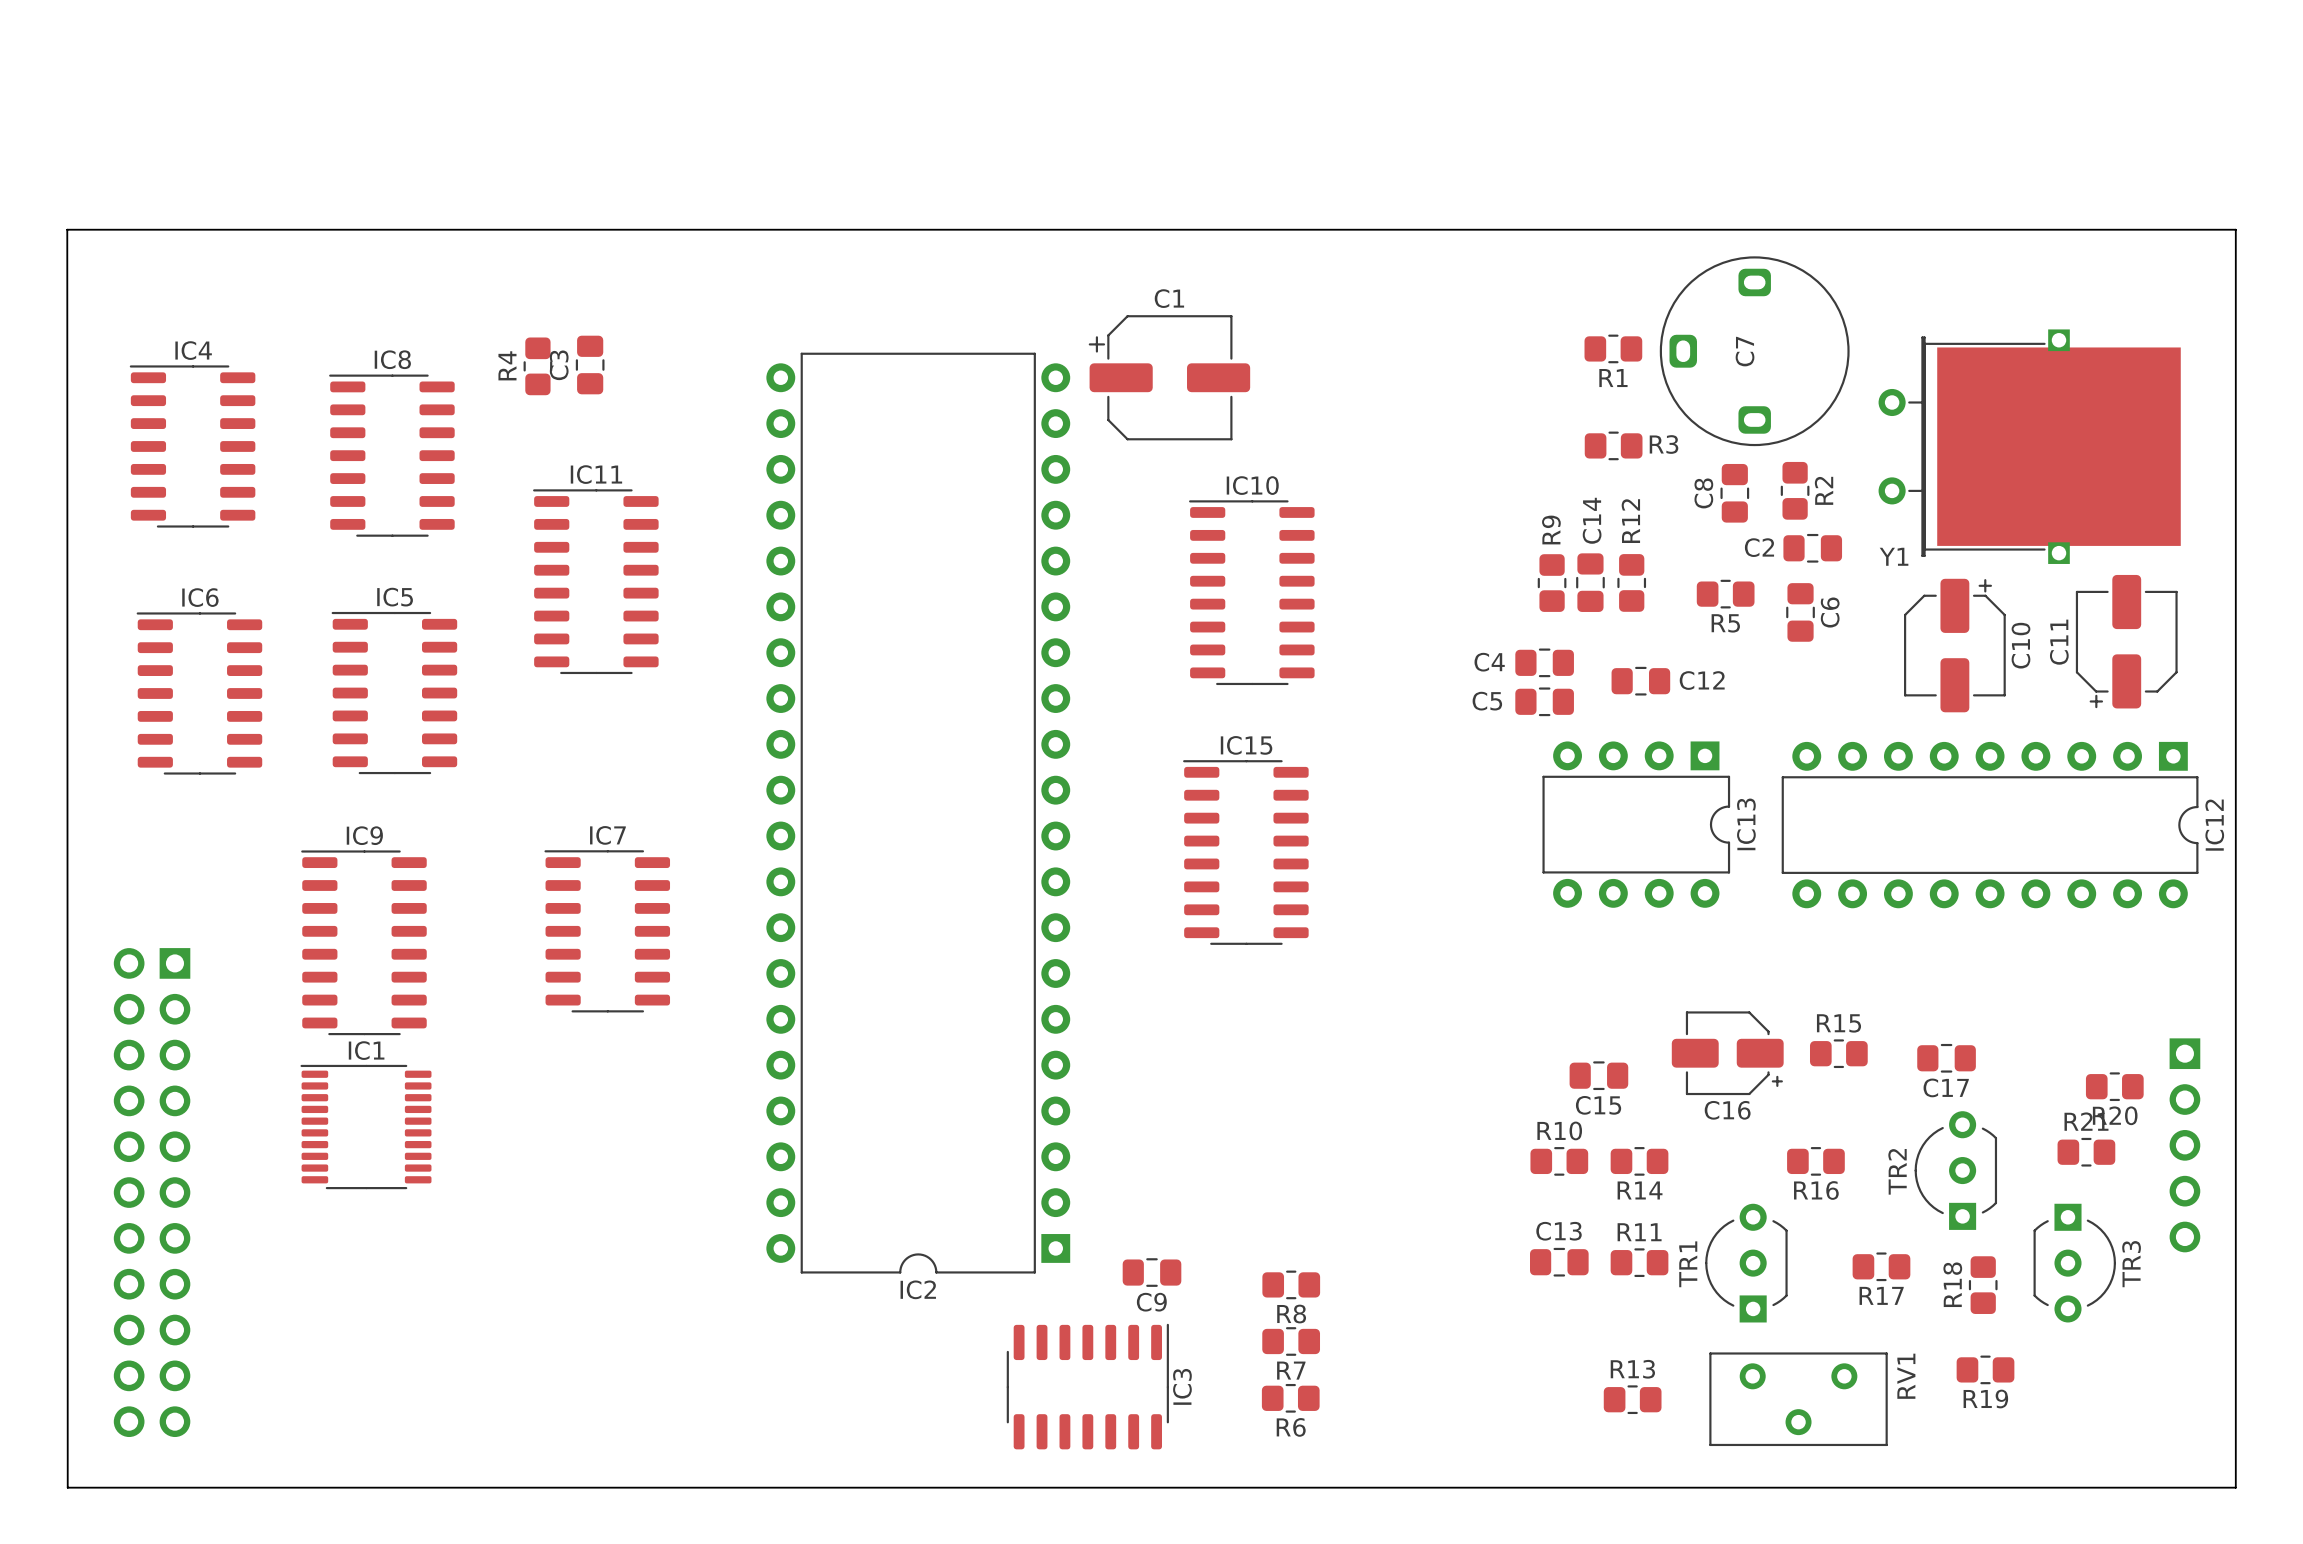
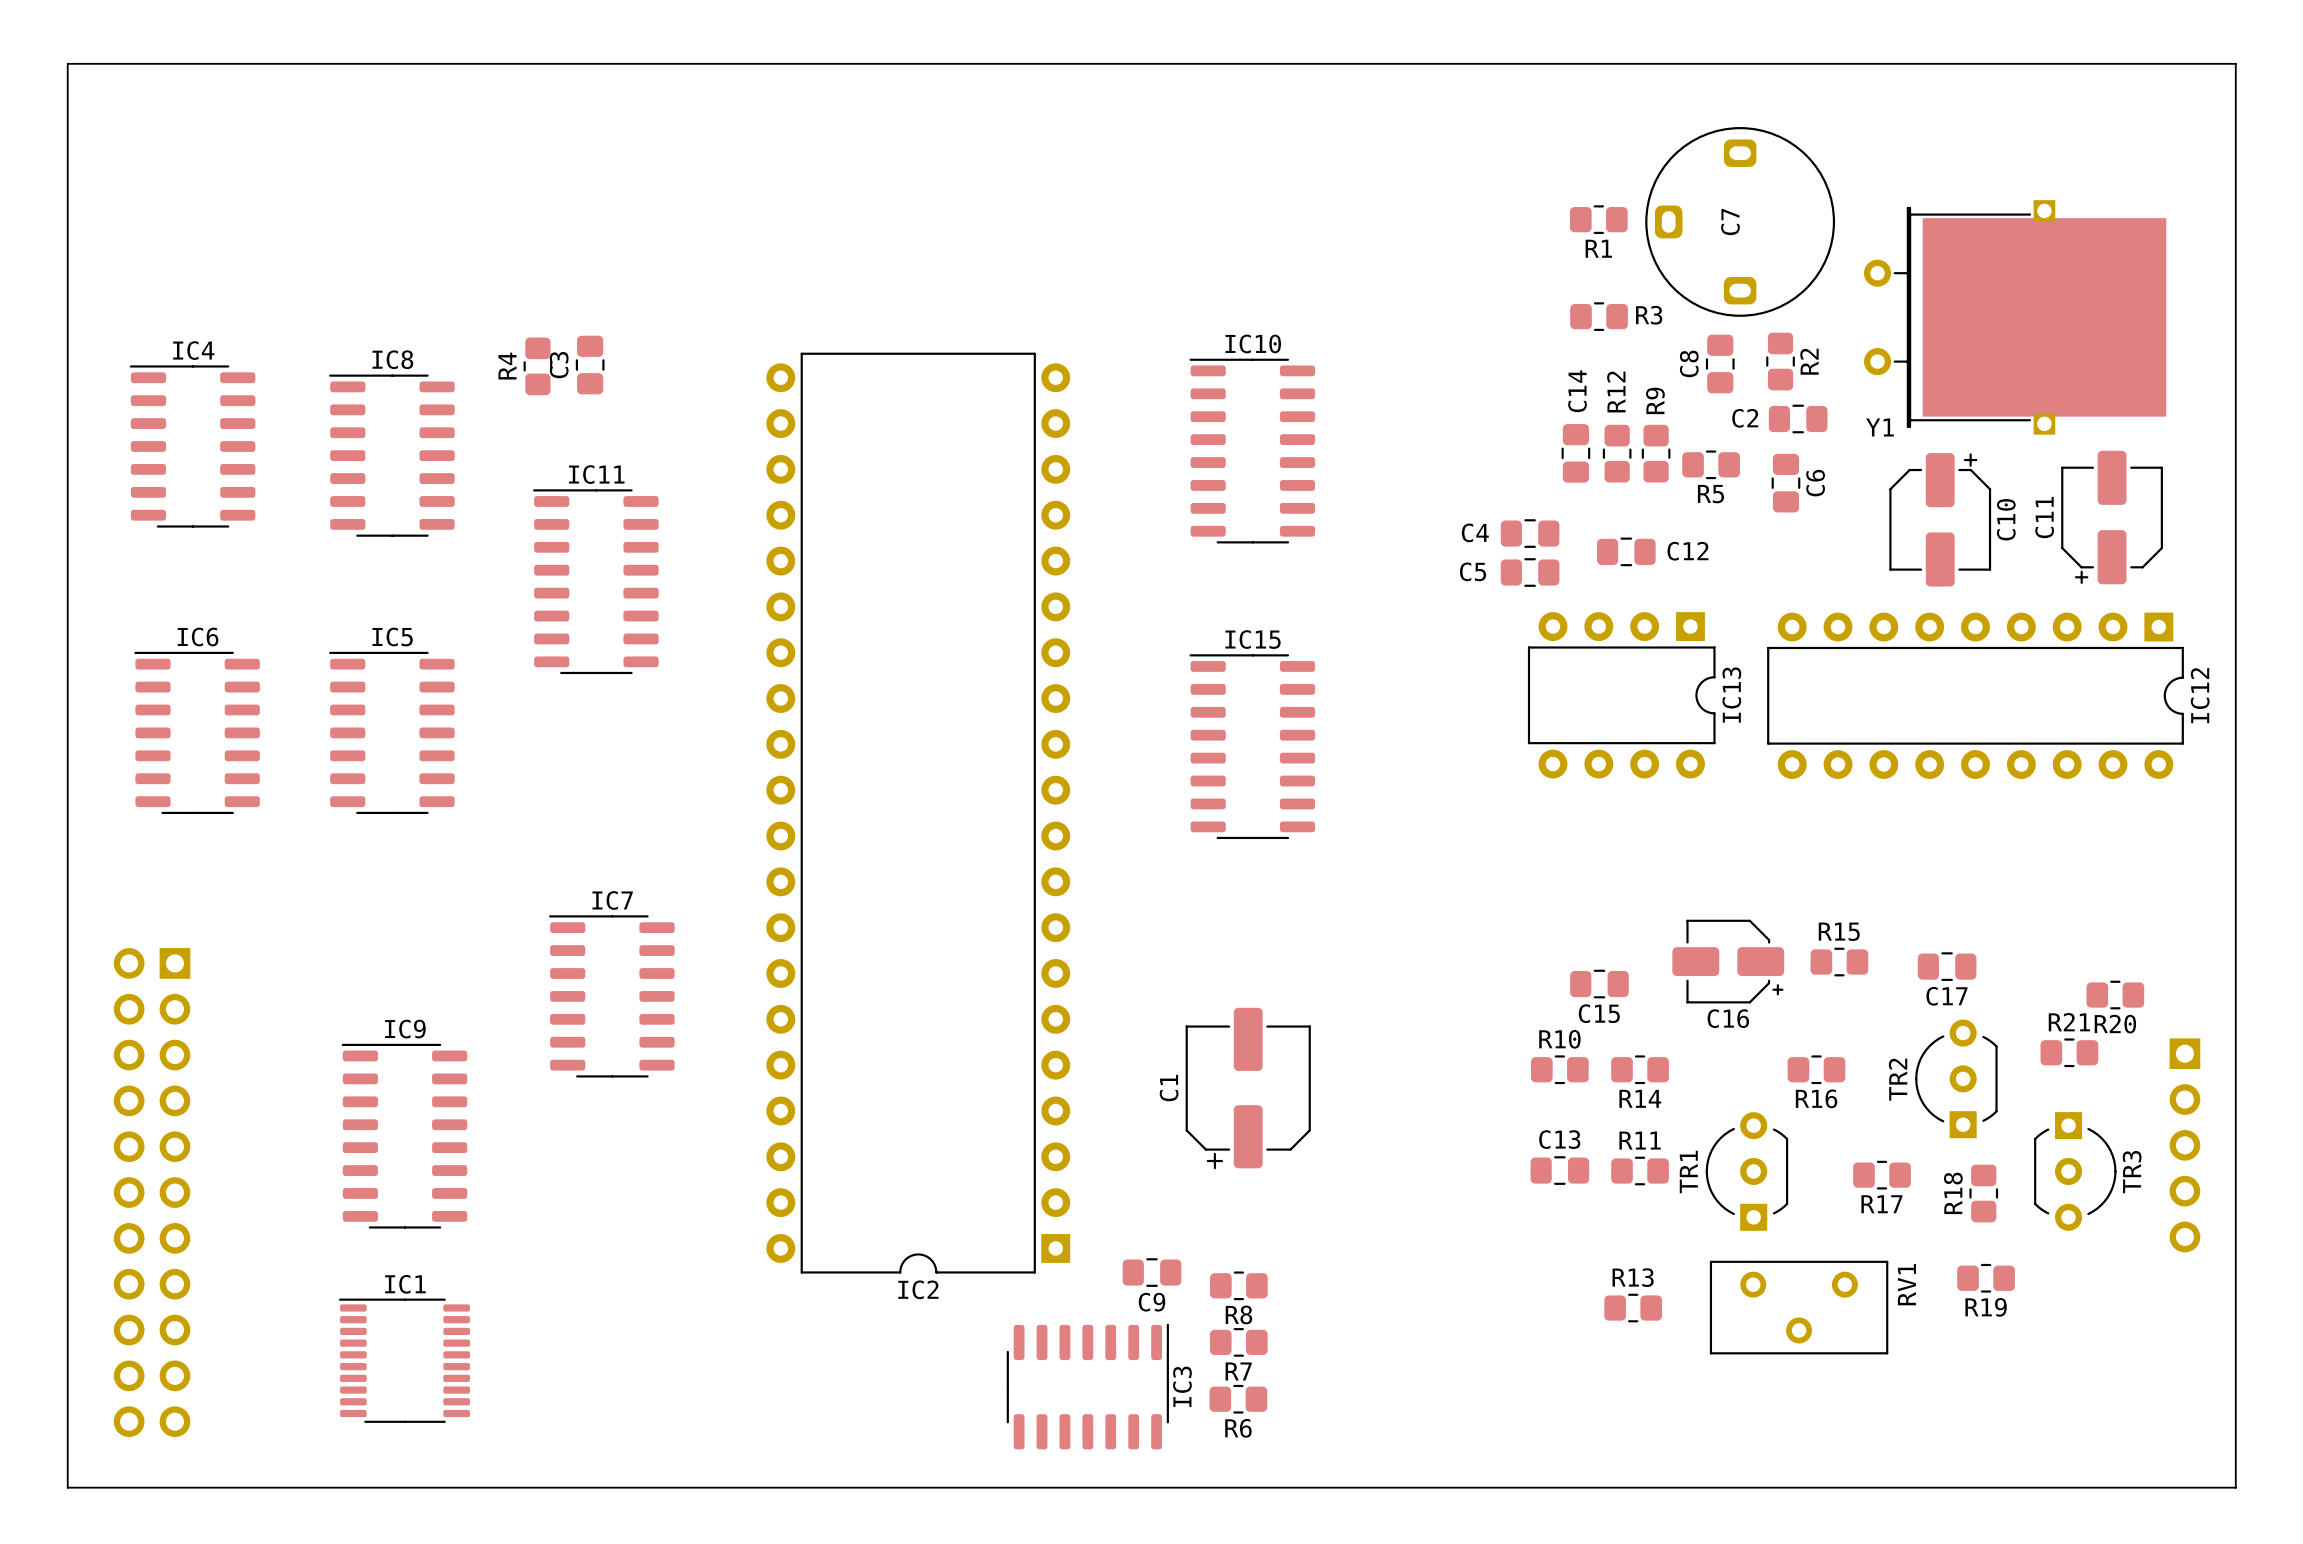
board edge: (2235, 229) (67, 229) (67, 1487) -> (2235, 229) (2235, 63) (67, 63) (67, 1487)
R1 position: (1613, 348) -> (1598, 219)
C7 position: (1754, 351) -> (1740, 221)
C1 rotation: 0° (1169, 377) -> 90° counterclockwise (1248, 1088)
C1 position: (1169, 377) -> (1248, 1088)
R3 position: (1613, 445) -> (1599, 316)
Y1 position: (2029, 446) -> (2015, 317)
R2 position: (1795, 490) -> (1780, 361)
C8 position: (1734, 493) -> (1720, 364)
C2 position: (1812, 548) -> (1798, 418)
C14 position: (1590, 582) -> (1575, 453)
R12 position: (1631, 582) -> (1617, 453)
R9 position: (1552, 583) -> (1656, 453)
IC10 position: (1251, 592) -> (1252, 451)
R5 position: (1725, 594) -> (1711, 464)
C6 position: (1800, 612) -> (1785, 483)
C11 position: (2126, 641) -> (2112, 517)
C10 position: (1954, 645) -> (1940, 519)
C4 position: (1544, 662) -> (1530, 533)
C12 position: (1640, 681) -> (1626, 551)
IC6 position: (199, 693) -> (197, 732)
IC5 position: (394, 693) -> (391, 732)
C5 position: (1544, 701) -> (1530, 572)
IC13 position: (1636, 824) -> (1621, 695)
IC12 position: (1990, 825) -> (1975, 695)
IC15 position: (1245, 852) -> (1252, 746)
IC7 position: (607, 931) -> (611, 996)
IC9 position: (363, 942) -> (404, 1136)
C16 position: (1727, 1053) -> (1728, 961)
R15 position: (1838, 1053) -> (1839, 962)
C17 position: (1946, 1058) -> (1947, 966)
C15 position: (1598, 1075) -> (1599, 984)
R20 position: (2114, 1086) -> (2115, 995)
IC1 position: (365, 1127) -> (404, 1360)
R21 position: (2086, 1152) -> (2069, 1052)
R10 position: (1559, 1161) -> (1559, 1069)
R14 position: (1639, 1161) -> (1640, 1069)
R16 position: (1815, 1161) -> (1816, 1069)
TR2 position: (1955, 1170) -> (1956, 1078)
C13 position: (1559, 1262) -> (1559, 1170)
R11 position: (1639, 1262) -> (1640, 1171)
TR1 position: (1746, 1263) -> (1746, 1171)
TR3 position: (2074, 1263) -> (2075, 1171)
R17 position: (1881, 1266) -> (1882, 1175)
R8 position: (1291, 1284) -> (1238, 1285)
R18 position: (1983, 1285) -> (1983, 1193)
R7 position: (1291, 1341) -> (1238, 1342)
R19 position: (1985, 1369) -> (1986, 1278)
R6 position: (1290, 1398) -> (1238, 1399)
R13 position: (1632, 1399) -> (1633, 1308)
RV1 position: (1798, 1399) -> (1799, 1307)

